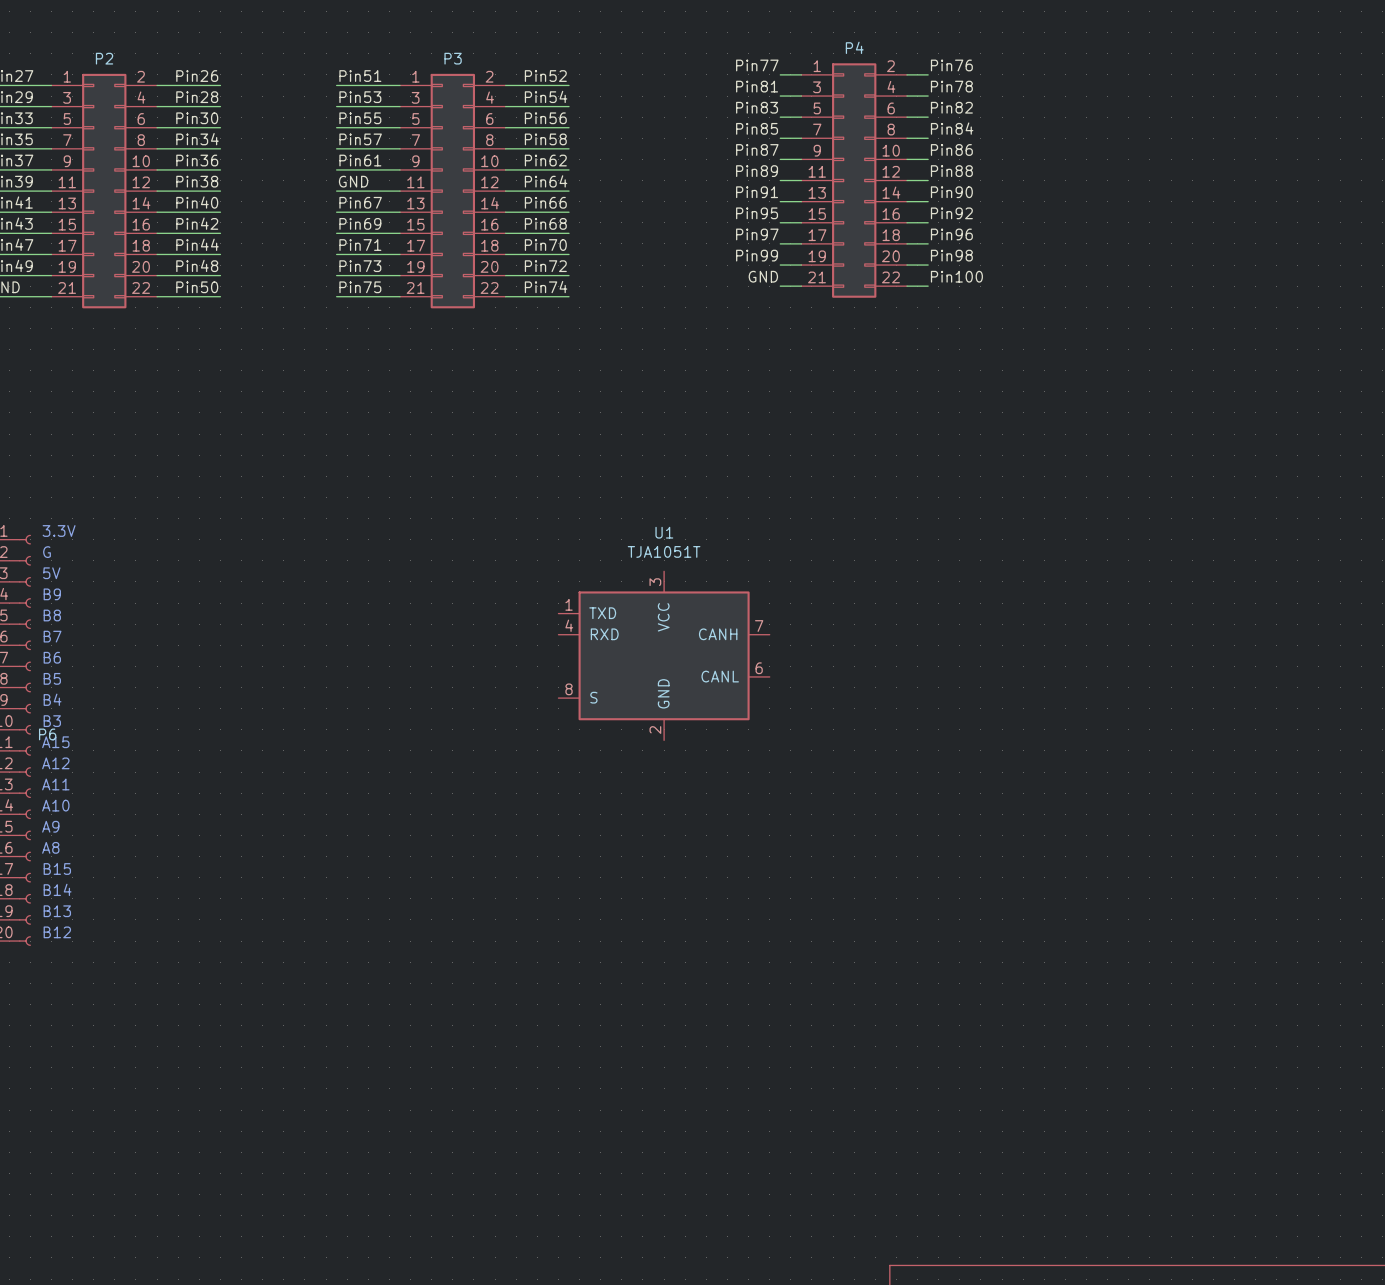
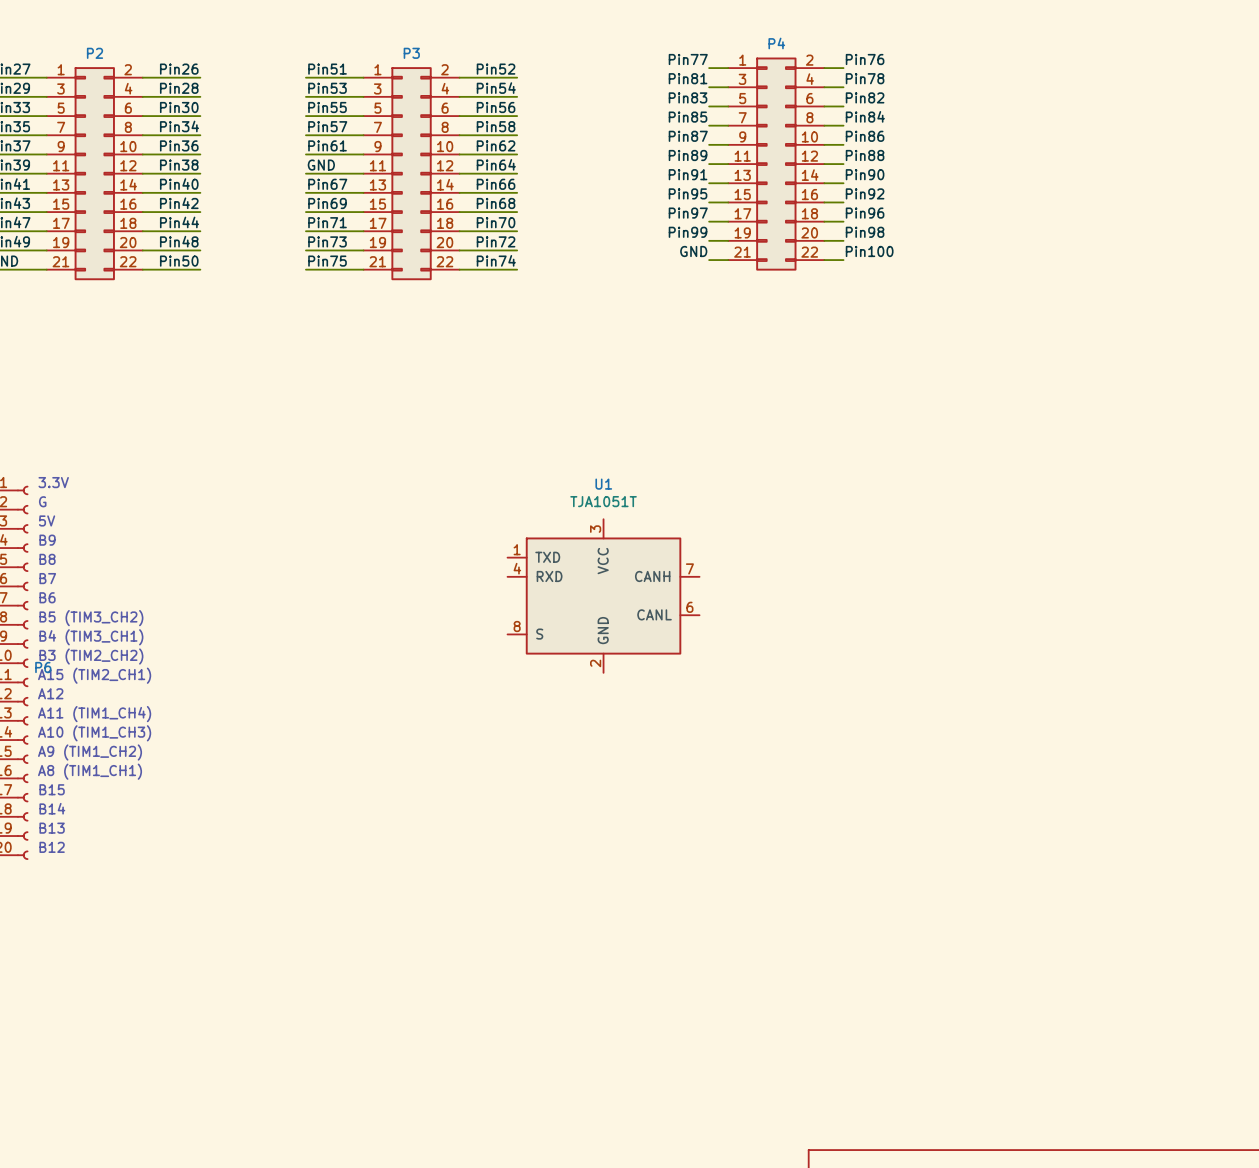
text: B5 (52, 678) -> B5 (TIM3_CH2) (91, 618)
text: B4 (52, 699) -> B4 (TIM3_CH1) (91, 637)
text: B3 (52, 721) -> B3 (TIM2_CH2) (91, 656)
text: A15 (55, 742) -> A15 (TIM2_CH1) (94, 675)
text: A11 (55, 784) -> A11 (TIM1_CH4) (94, 714)
text: A10 (55, 805) -> A10 (TIM1_CH3) (94, 733)
text: A9 (50, 826) -> A9 (TIM1_CH2) (90, 752)
text: A8 (50, 847) -> A8 (TIM1_CH1) (90, 771)

